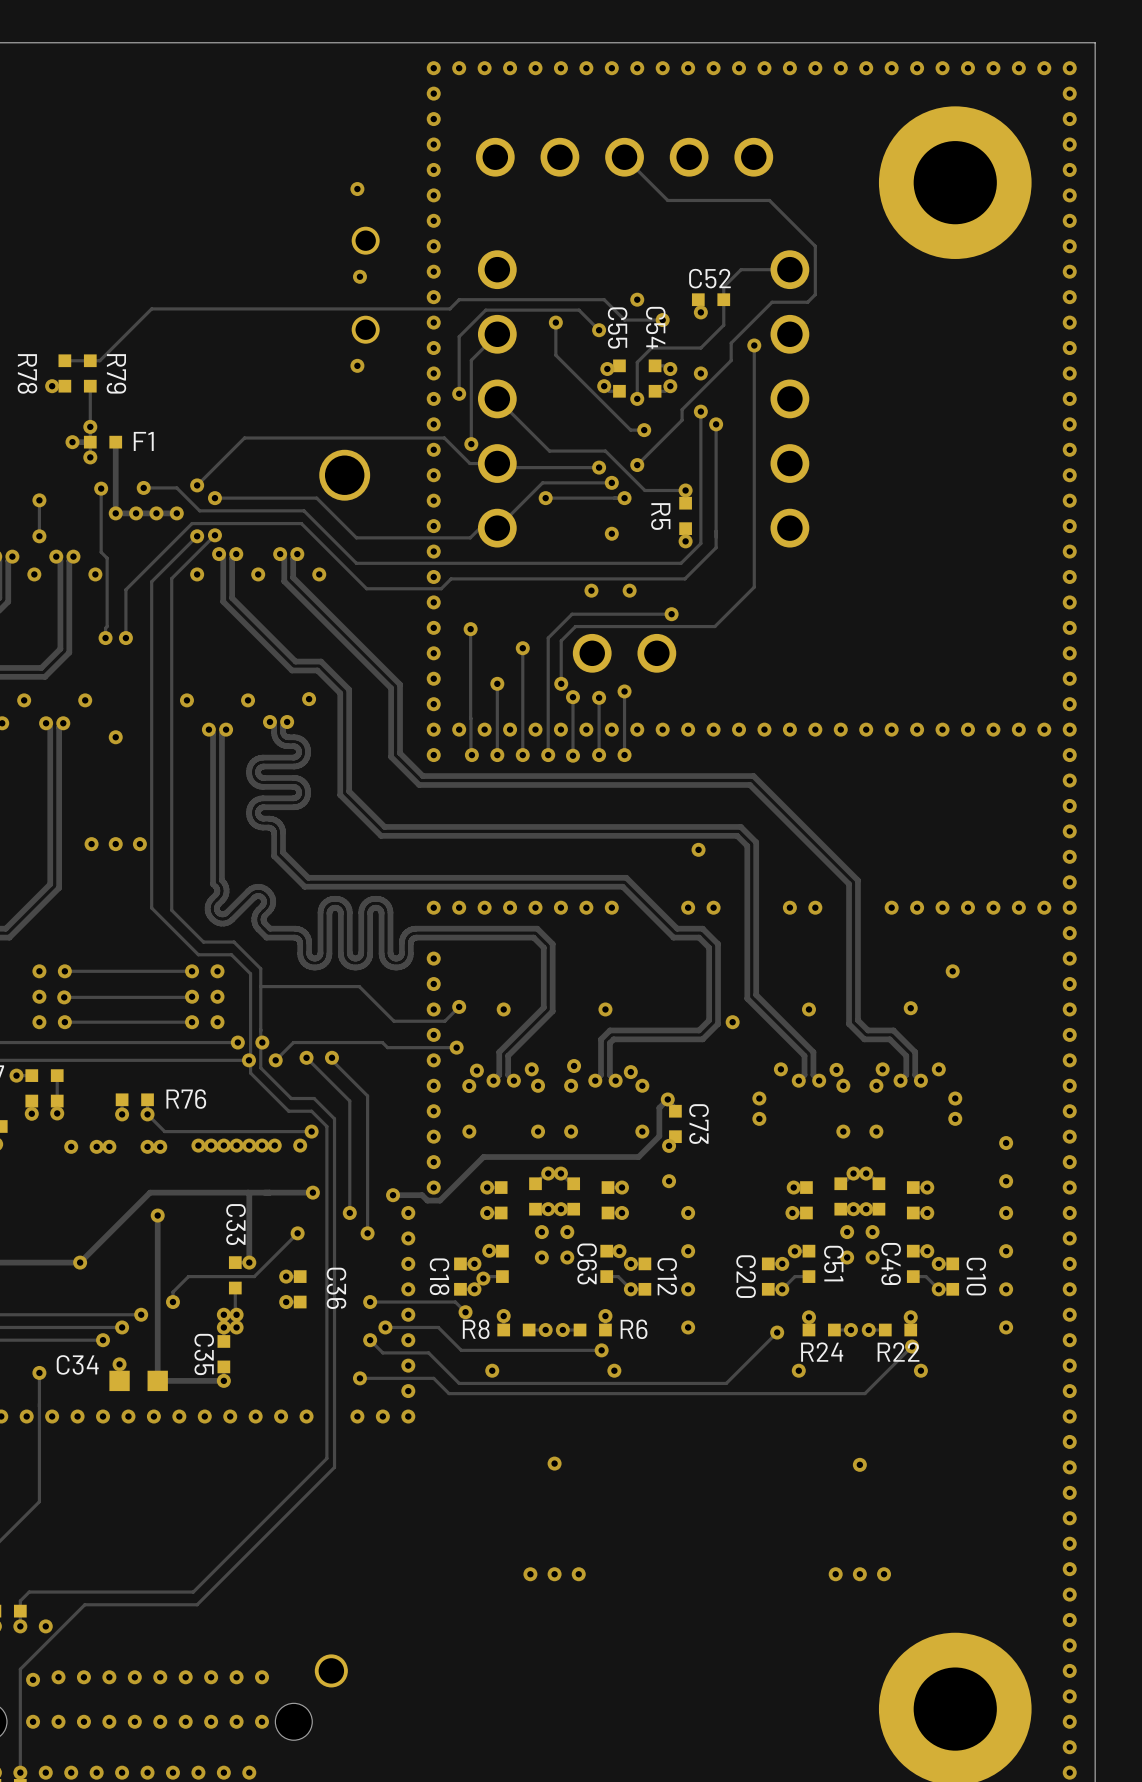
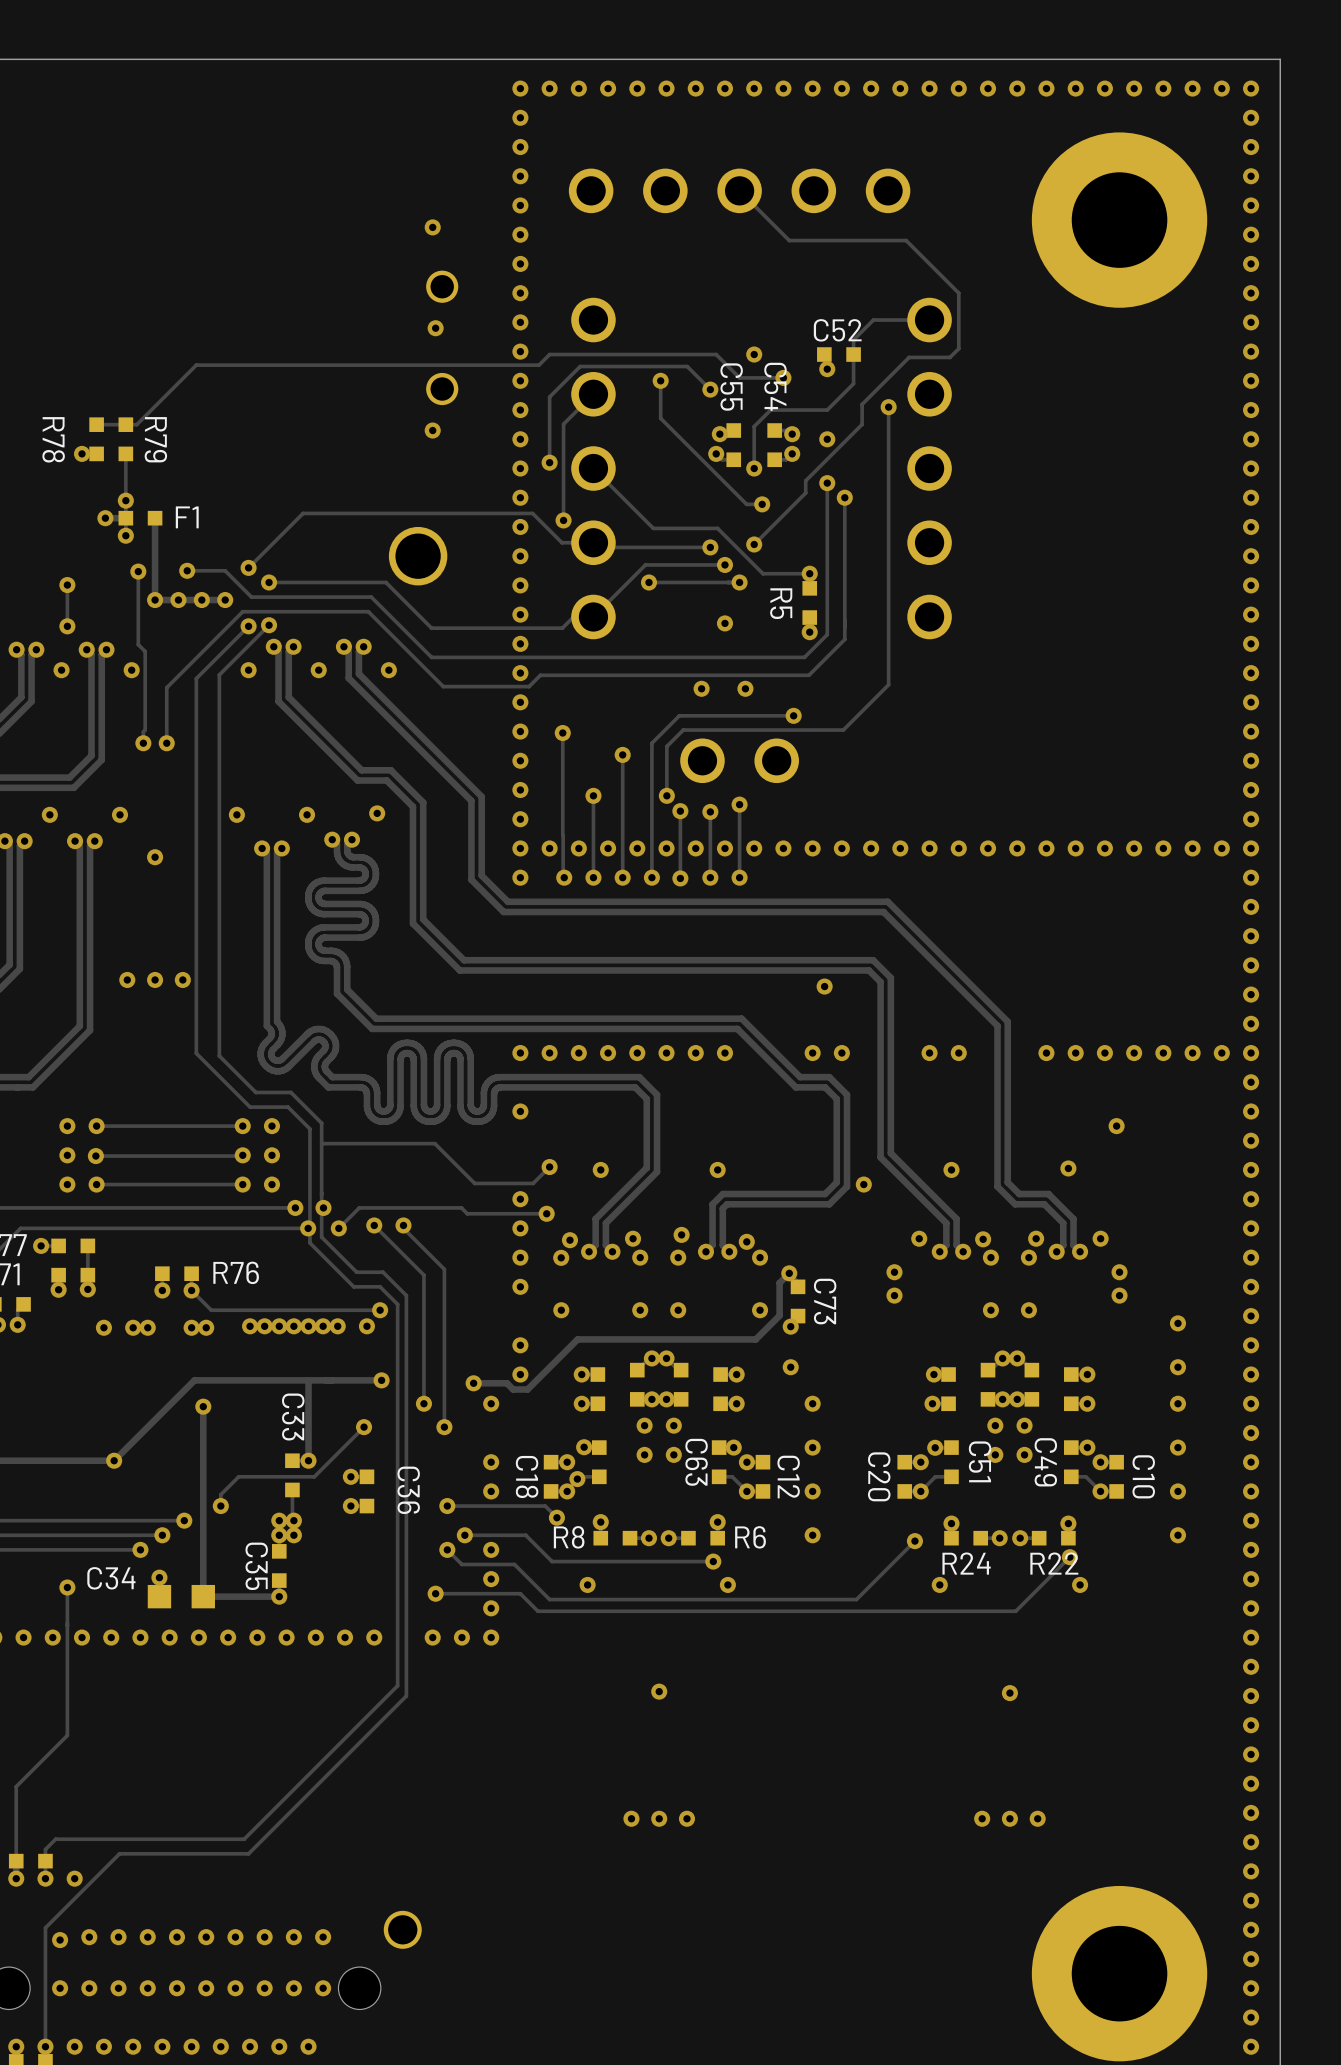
via: (433, 984) -> none
via: (433, 1009) -> none
via: (433, 1136) -> none
via: (408, 1238) -> none
via: (408, 1314) -> none

